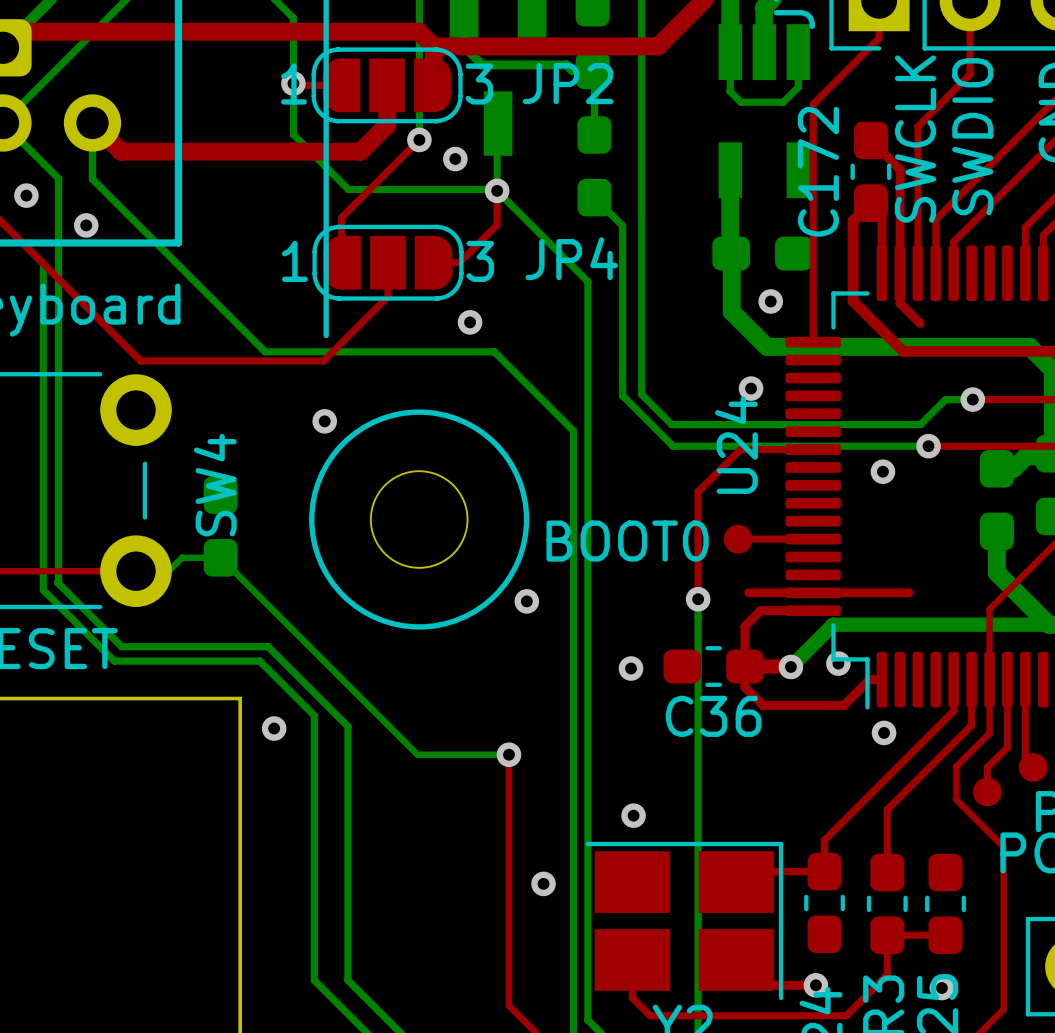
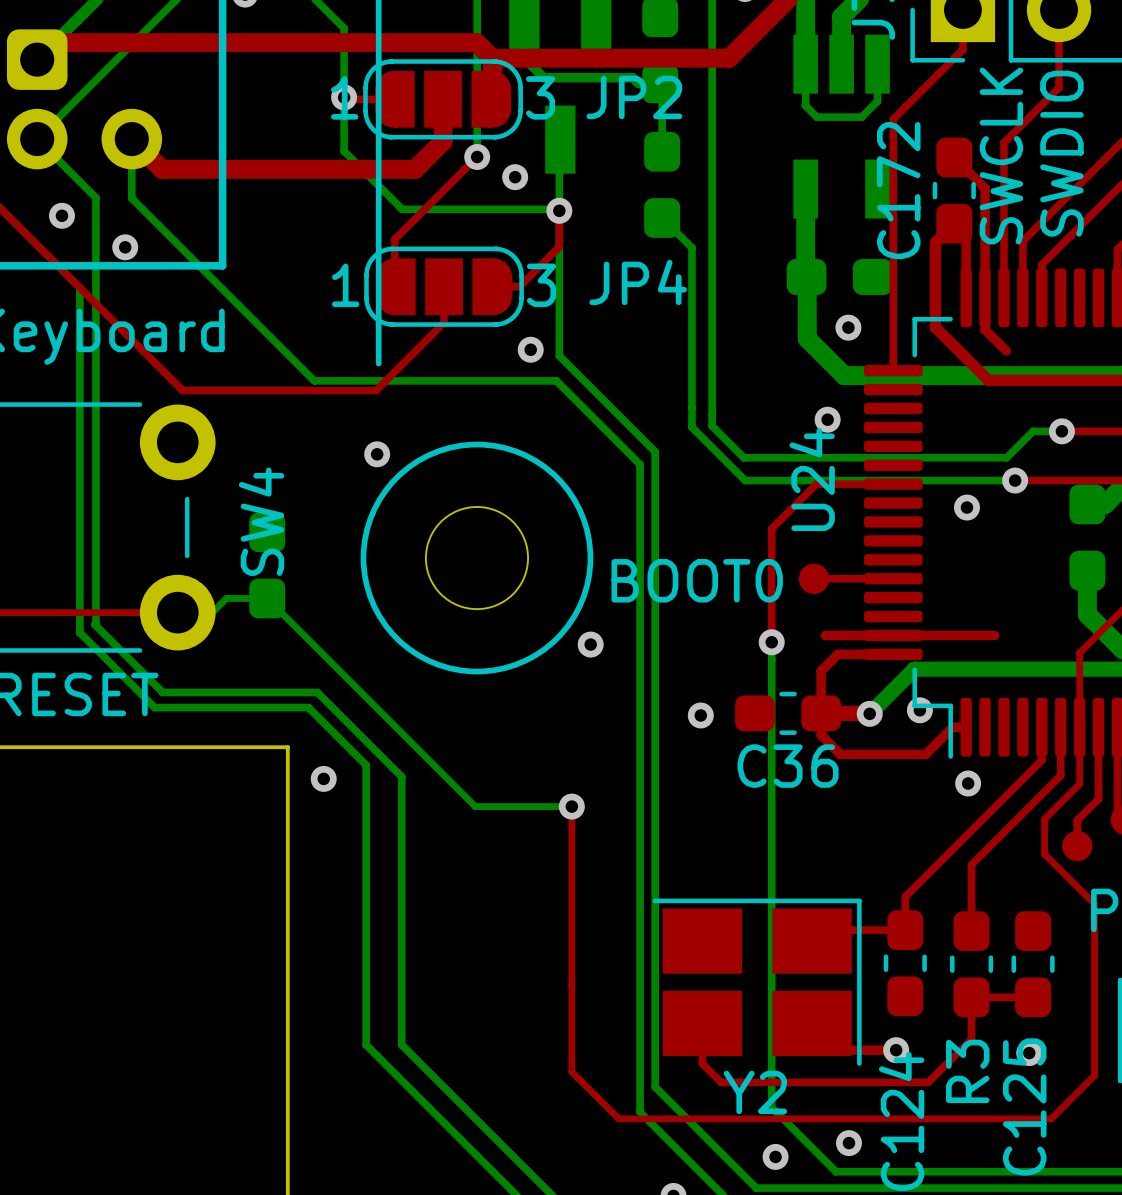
bottom track: (497, 190) (587, 281) (587, 418) -> (559, 210) (559, 355) (655, 451)
via: (633, 815) -> none
via: (543, 883) -> none

